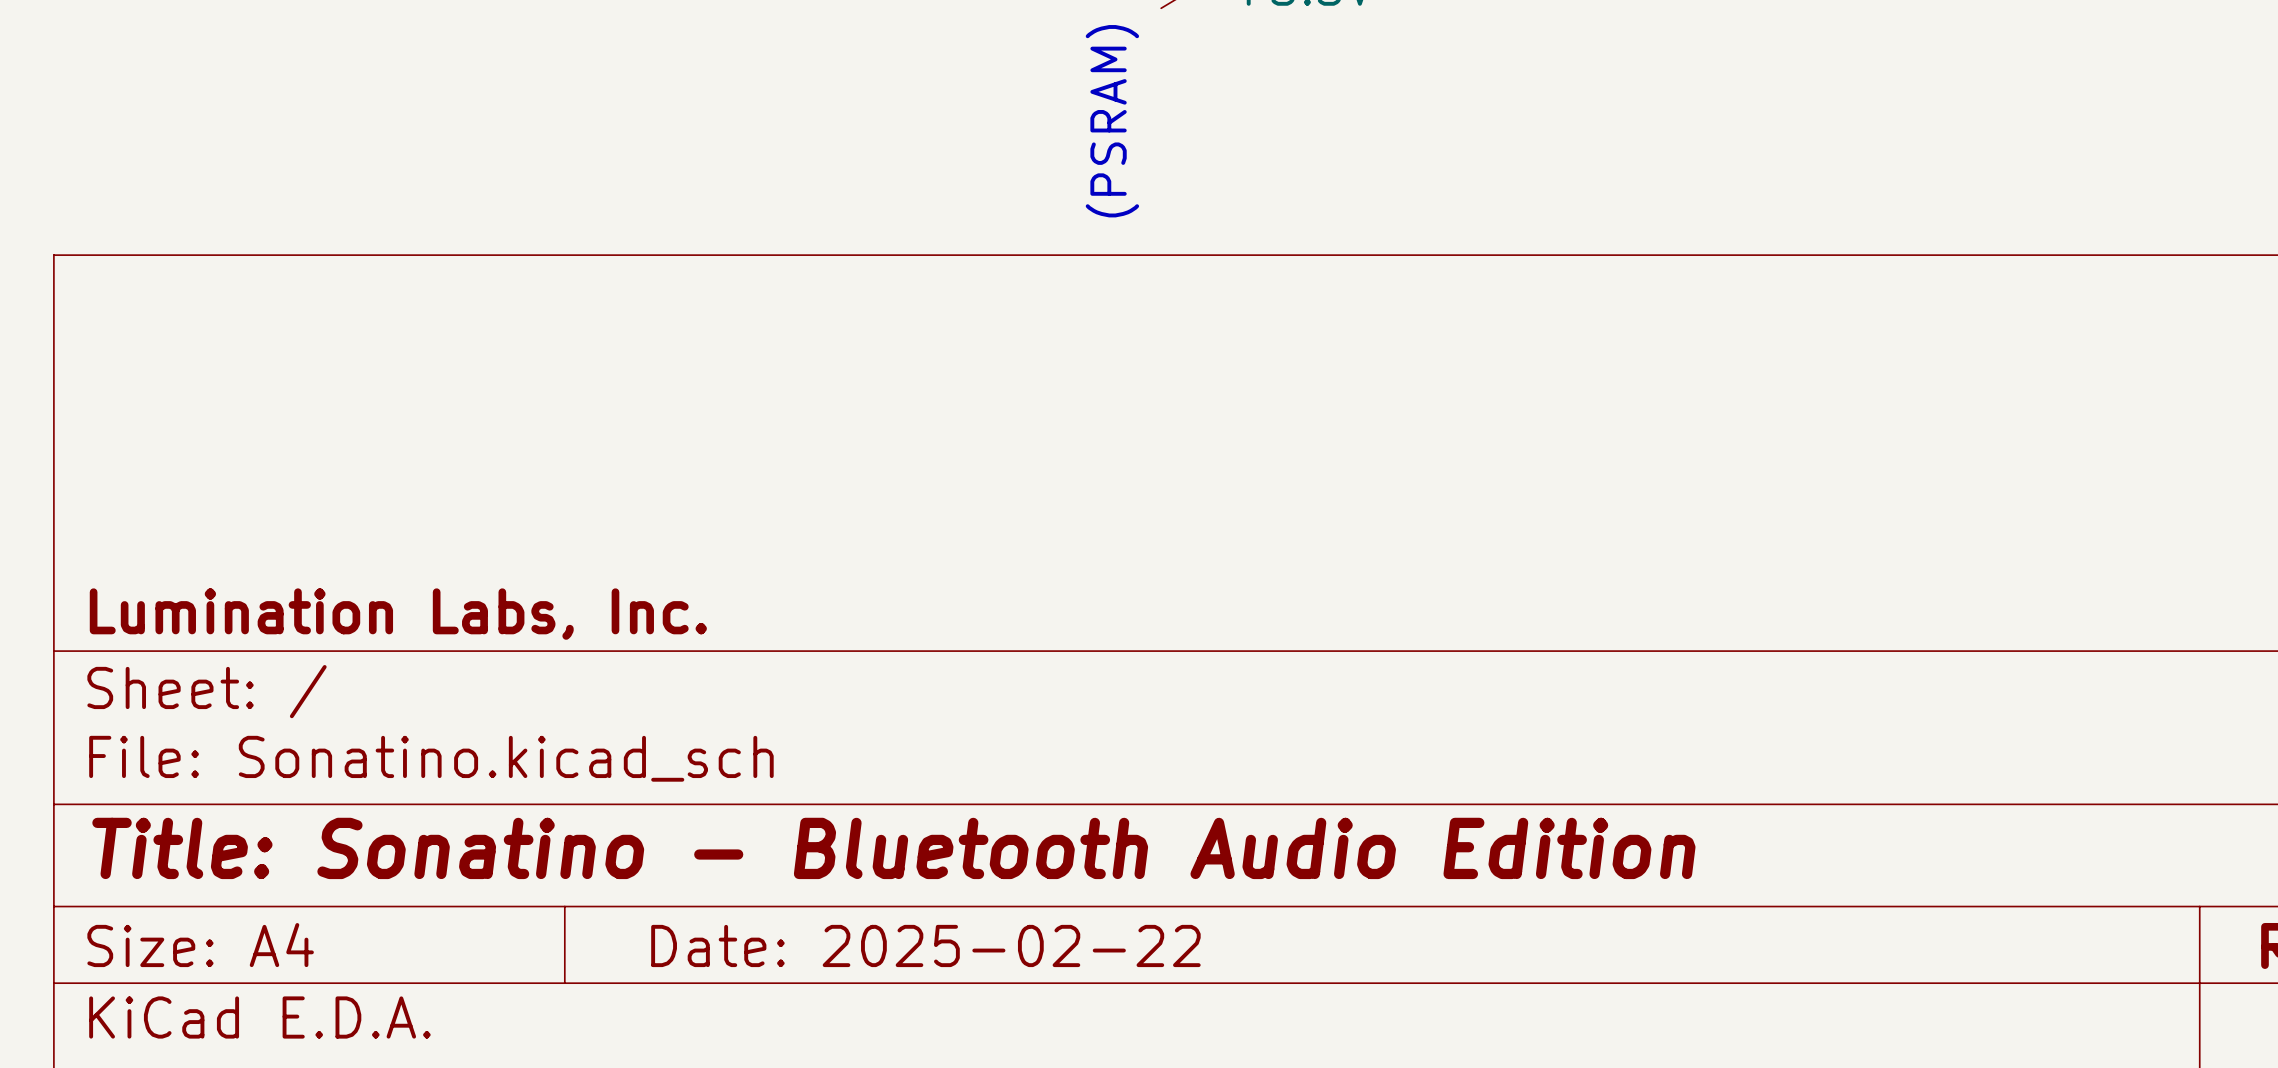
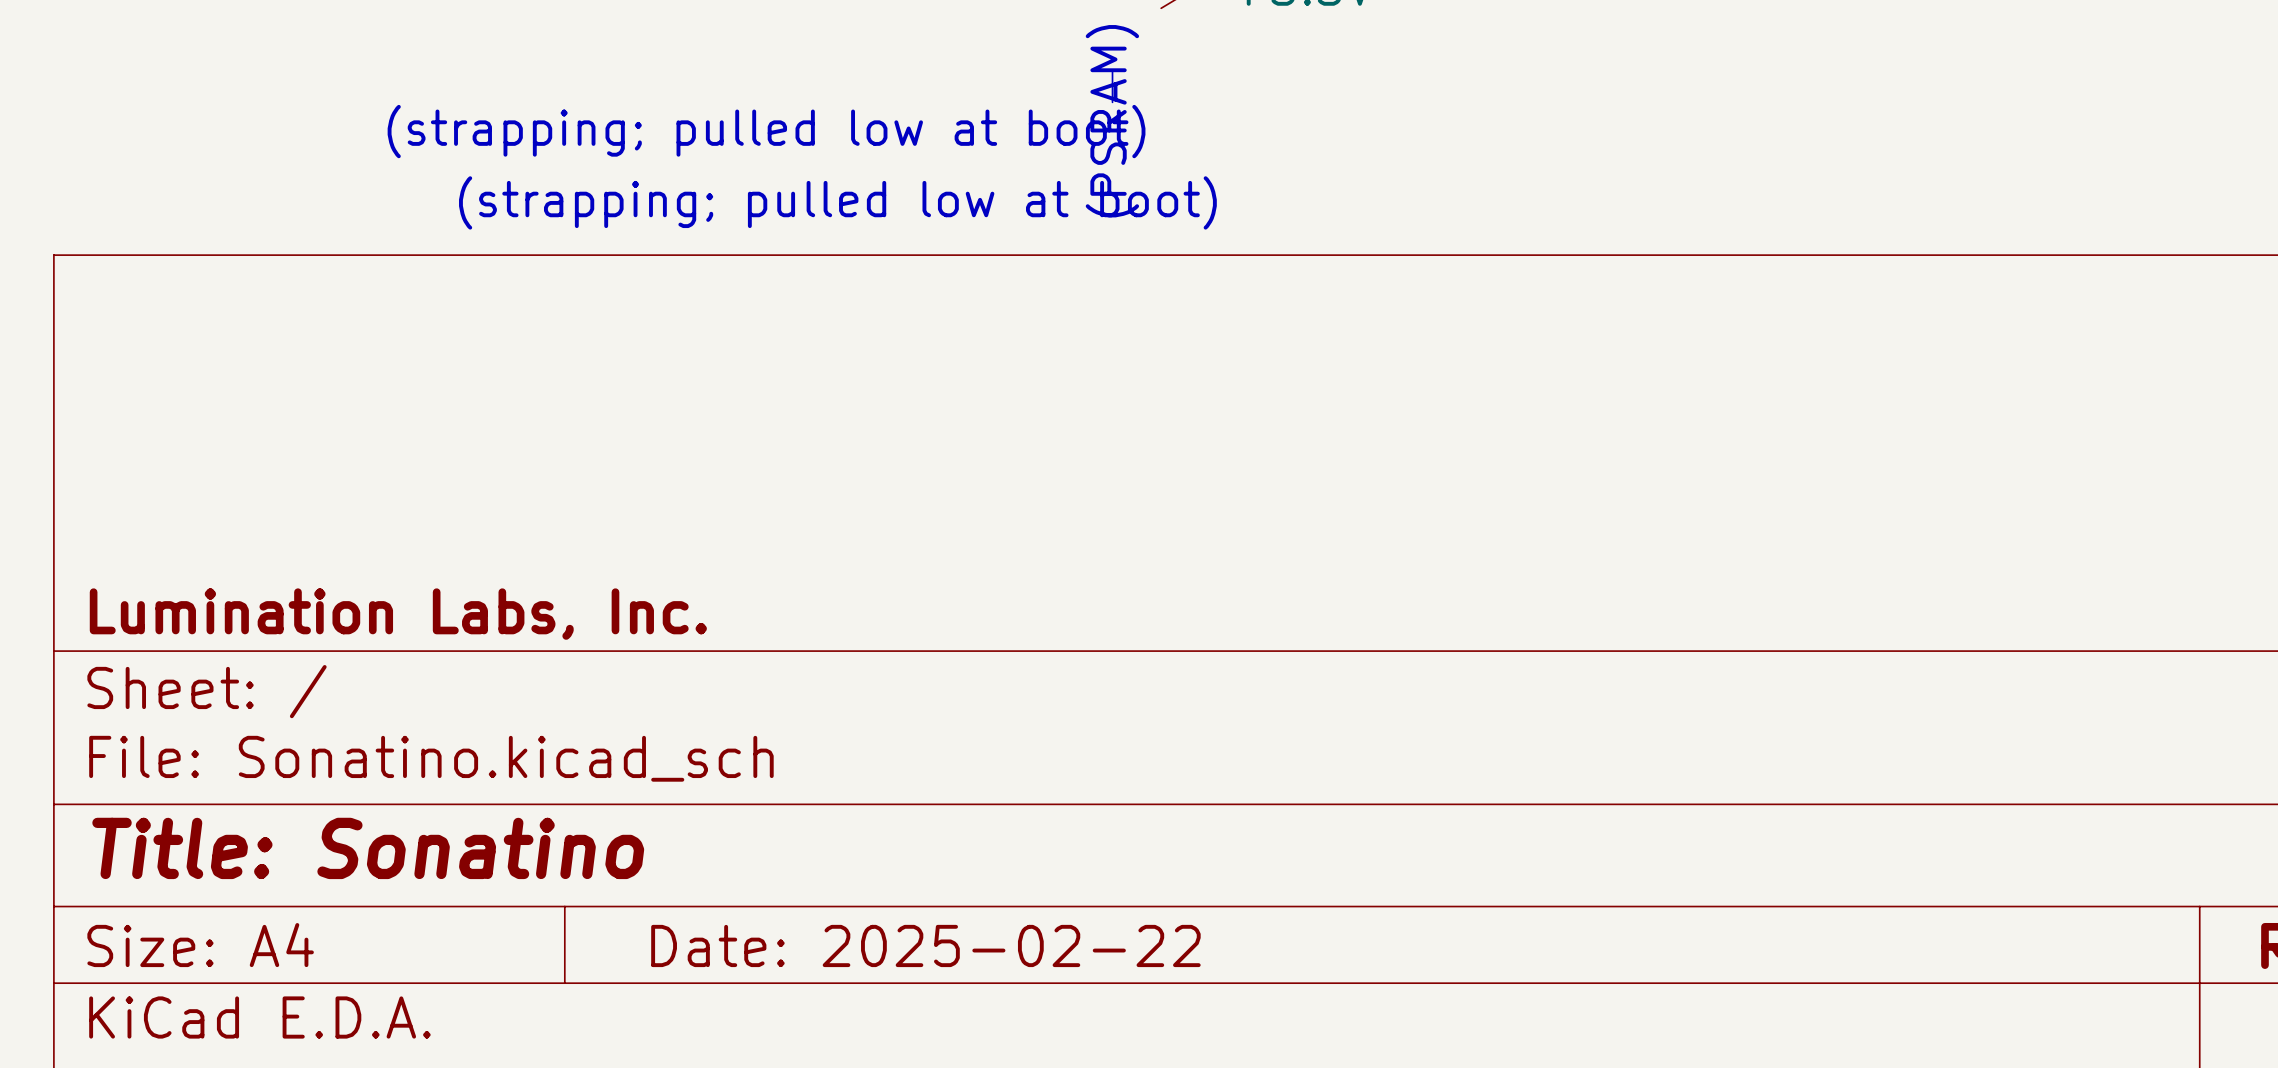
line: none -> (1112, 69) (1112, 102)
text: none -> (strapping; pulled low at boot) (766, 131)
text: none -> (strapping; pulled low at boot) (837, 202)
title block: Title: Sonatino - Bluetooth Audio Edition (893, 848) -> Title: Sonatino (368, 848)

